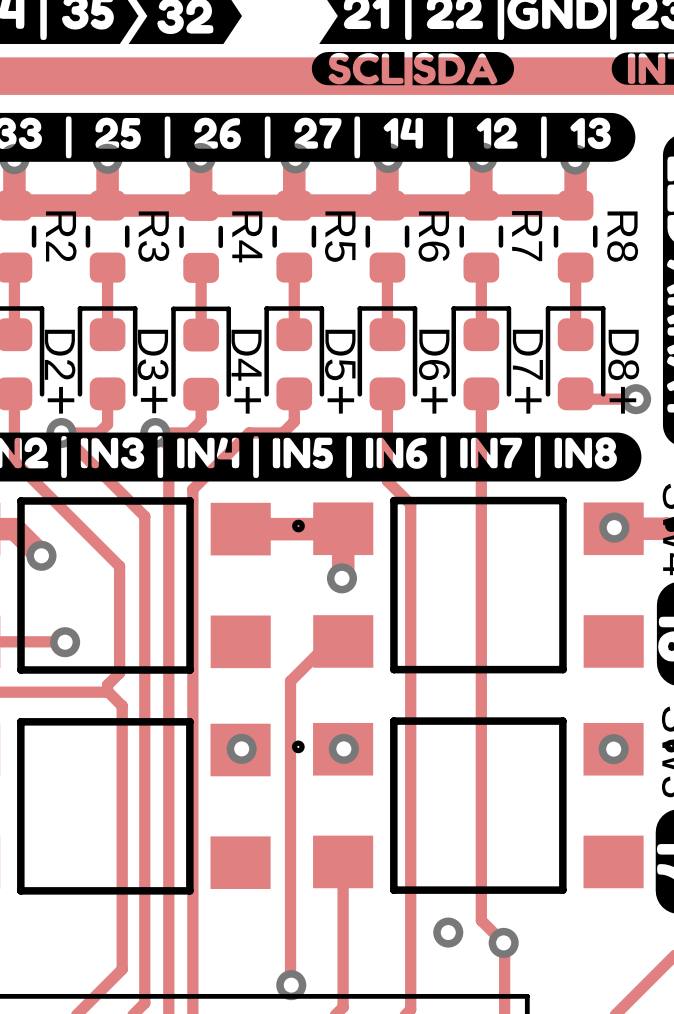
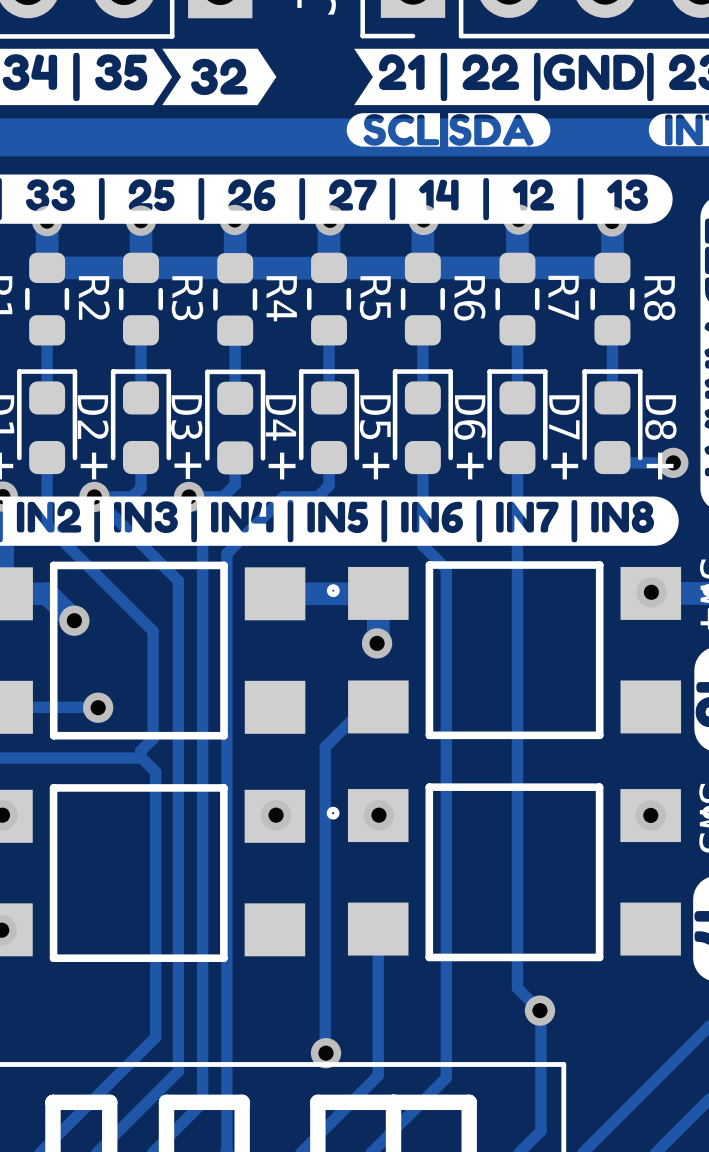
via: (448, 932) -> none

